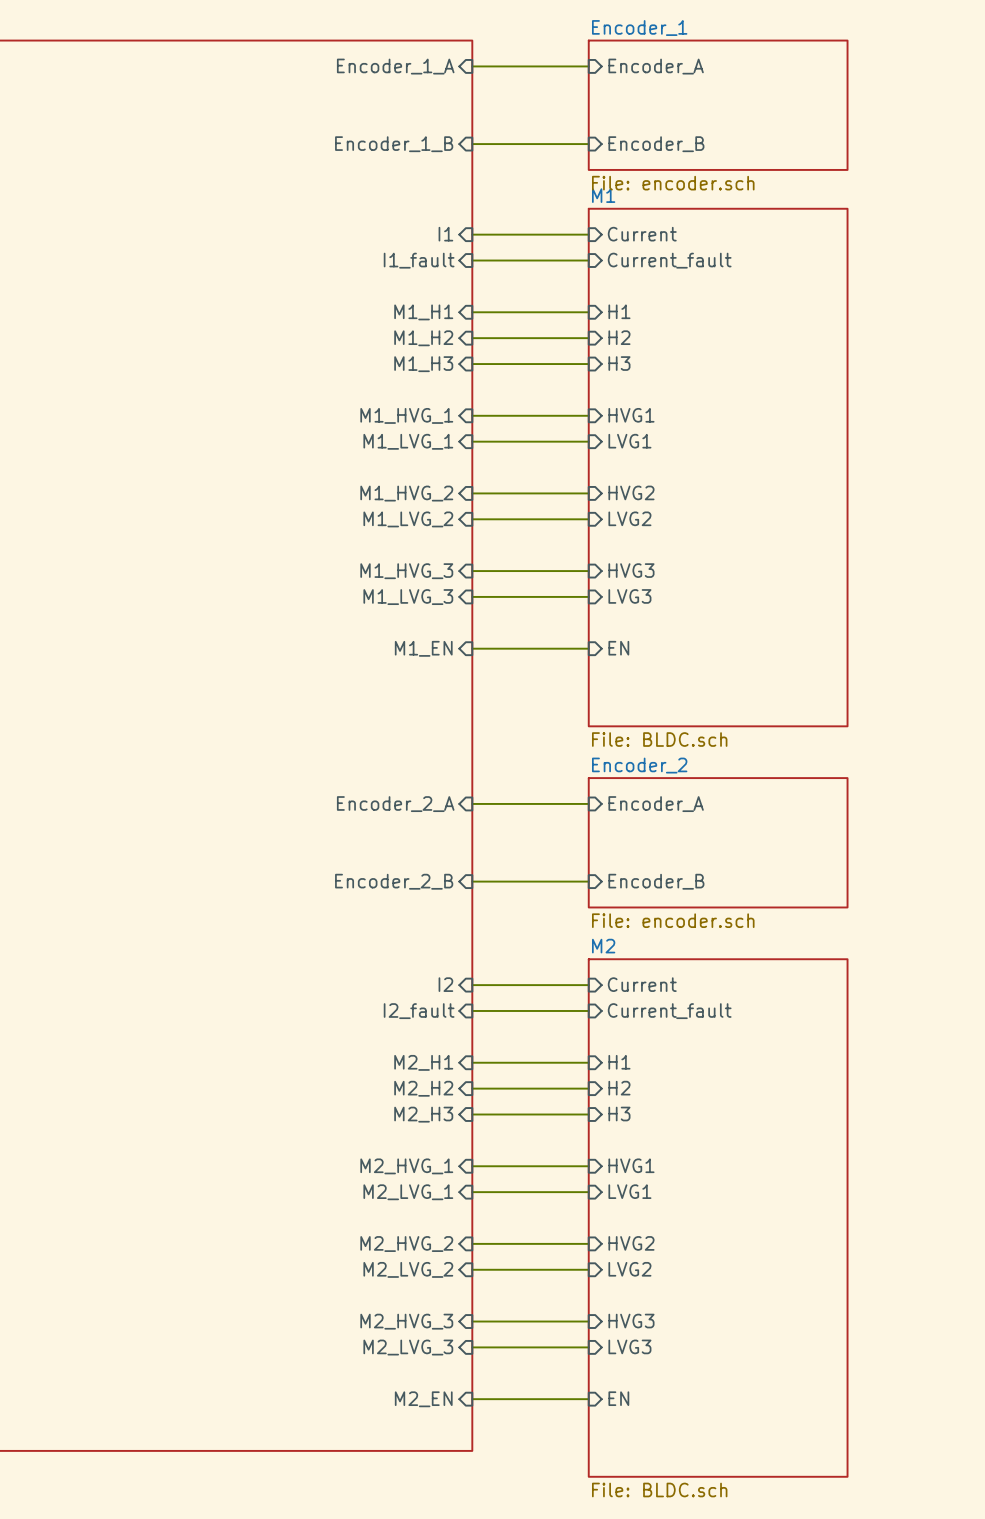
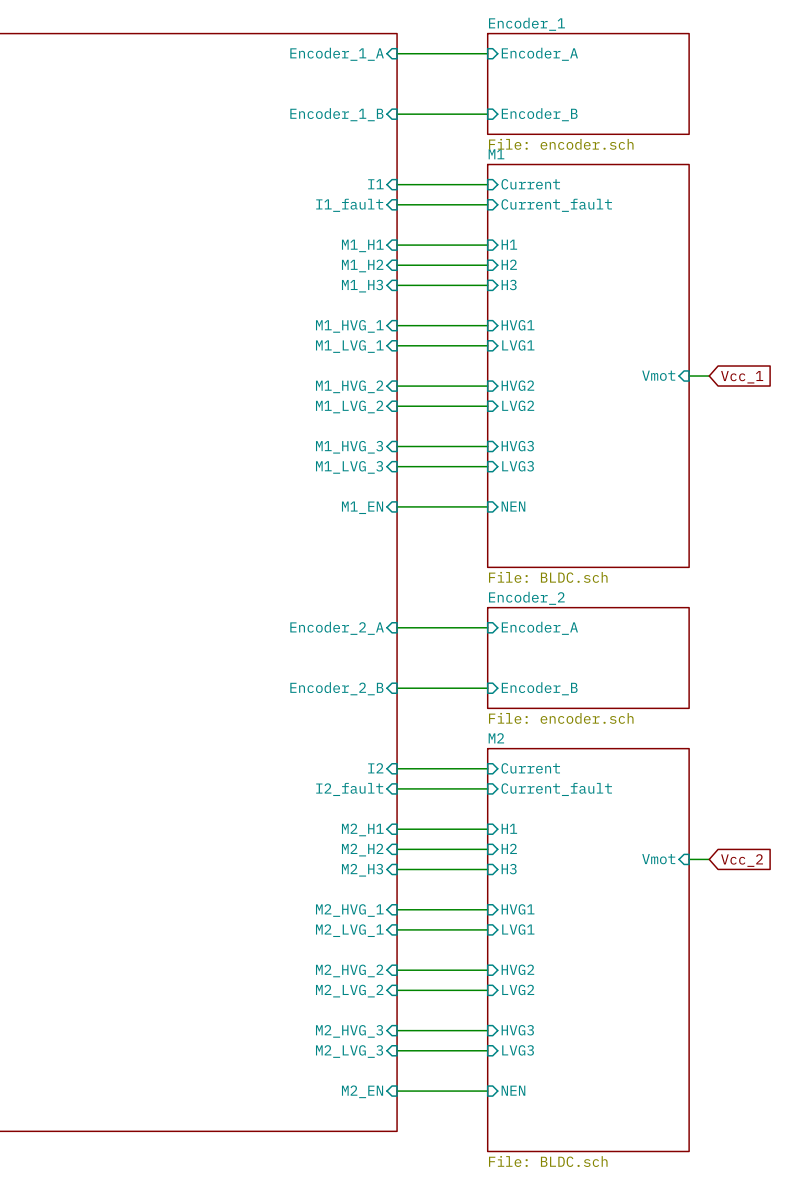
sheet pin: none -> Vmot (658, 375)
wire: none -> (689, 376) (709, 376)
global label: none -> Vcc_1 (742, 377)
sheet pin: EN (618, 648) -> NEN (513, 506)
sheet pin: none -> Vmot (658, 859)
wire: none -> (689, 859) (709, 859)
global label: none -> Vcc_2 (742, 860)
sheet pin: EN (618, 1398) -> NEN (513, 1090)

